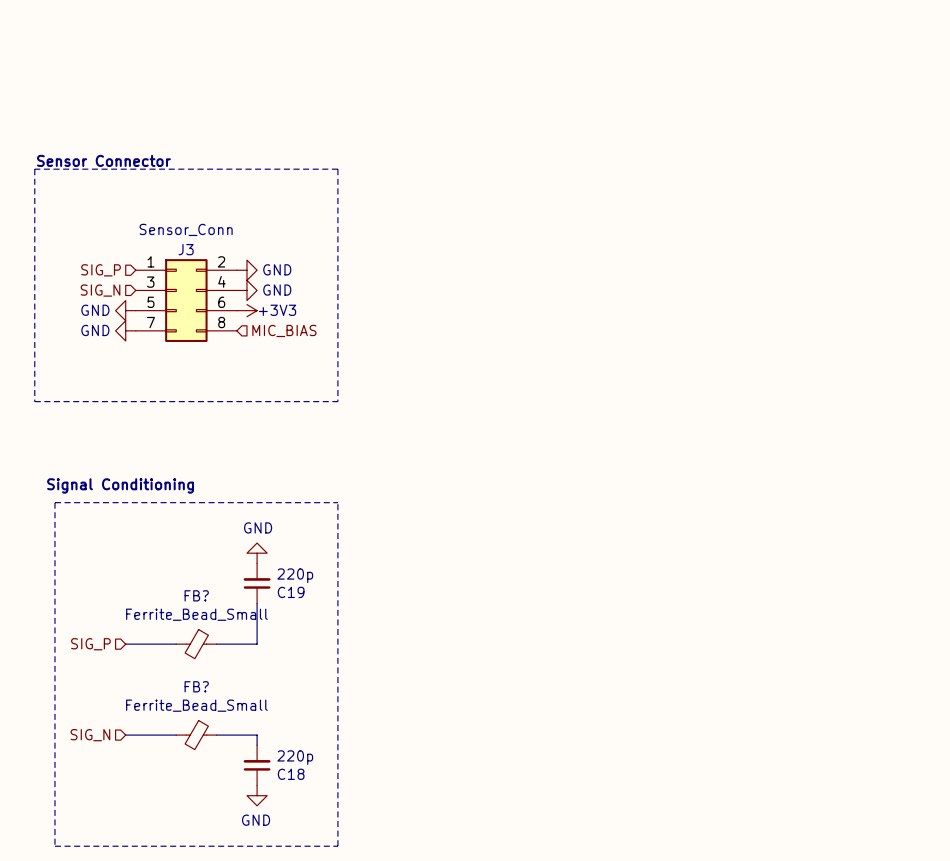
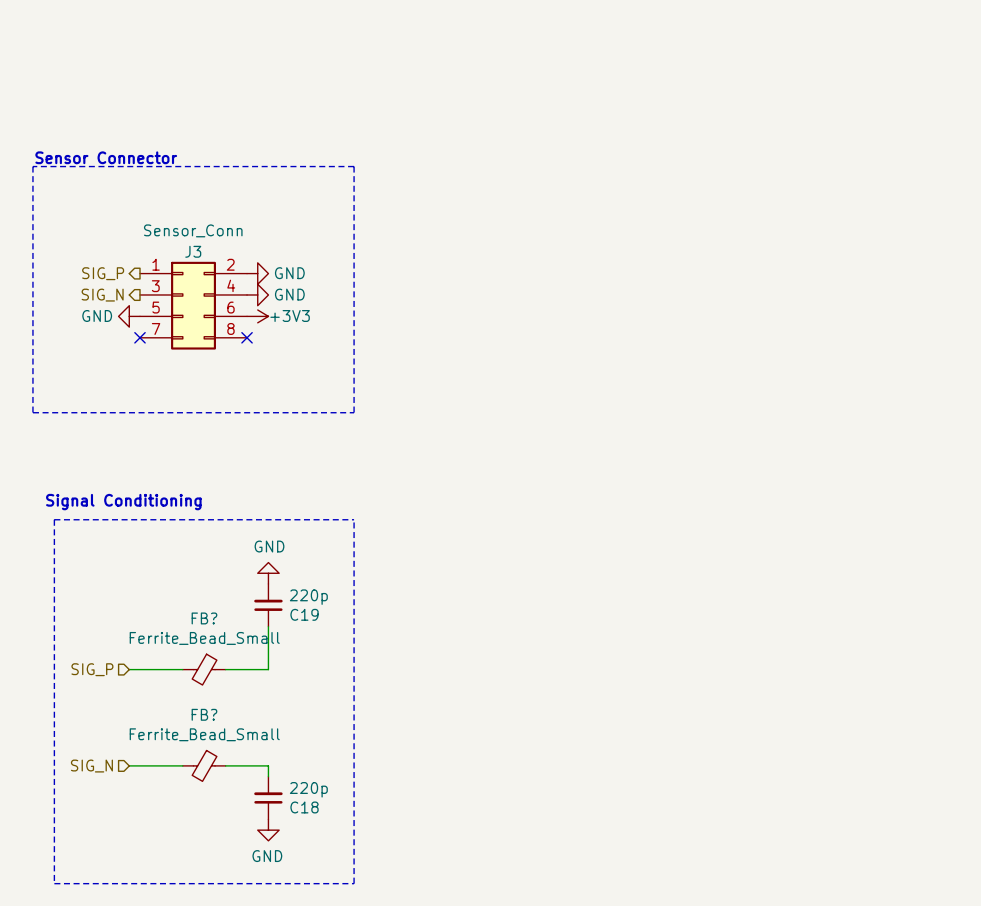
hierarchical label shape: input (101, 270) -> output (103, 273)
hierarchical label shape: input (100, 290) -> output (102, 295)
power symbol: GND (125, 330) -> none
no-connect mark: none -> (140, 337)
no-connect mark: none -> (247, 337)
hierarchical label: MIC_BIAS (284, 330) -> none

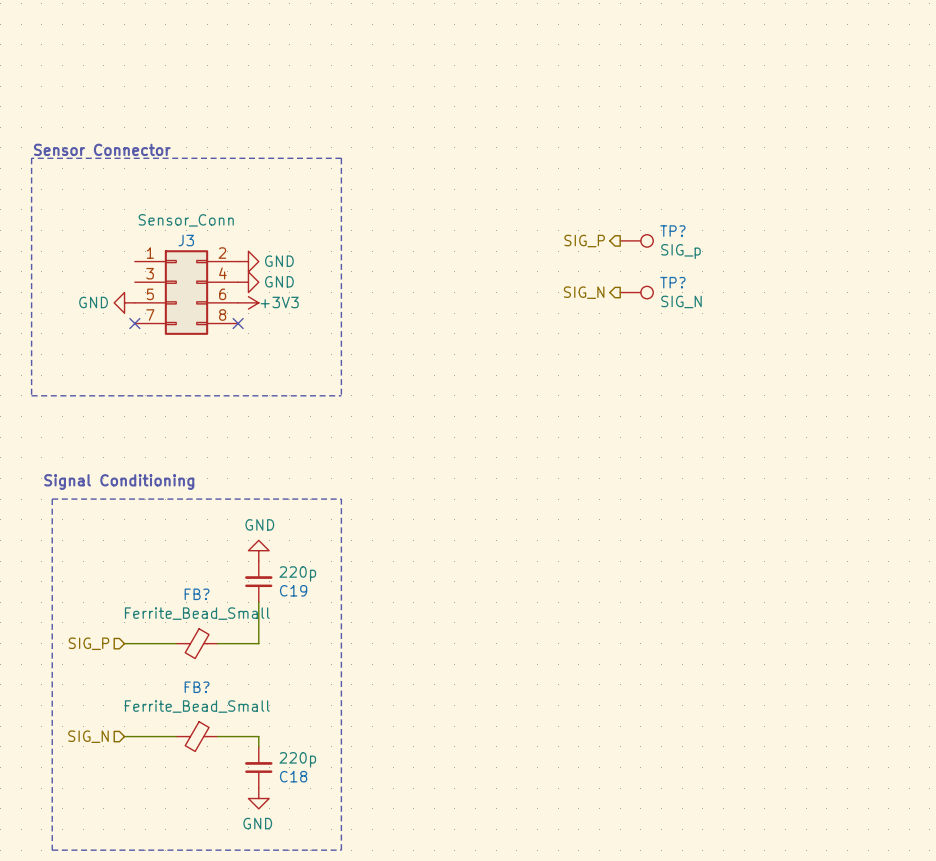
hierarchical label: none -> SIG_P (584, 241)
TP?: none -> SIG_p (636, 240)
hierarchical label: SIG_P (103, 273) -> none
hierarchical label: SIG_N (102, 295) -> none
hierarchical label: none -> SIG_N (584, 292)
TP?: none -> SIG_N (636, 292)

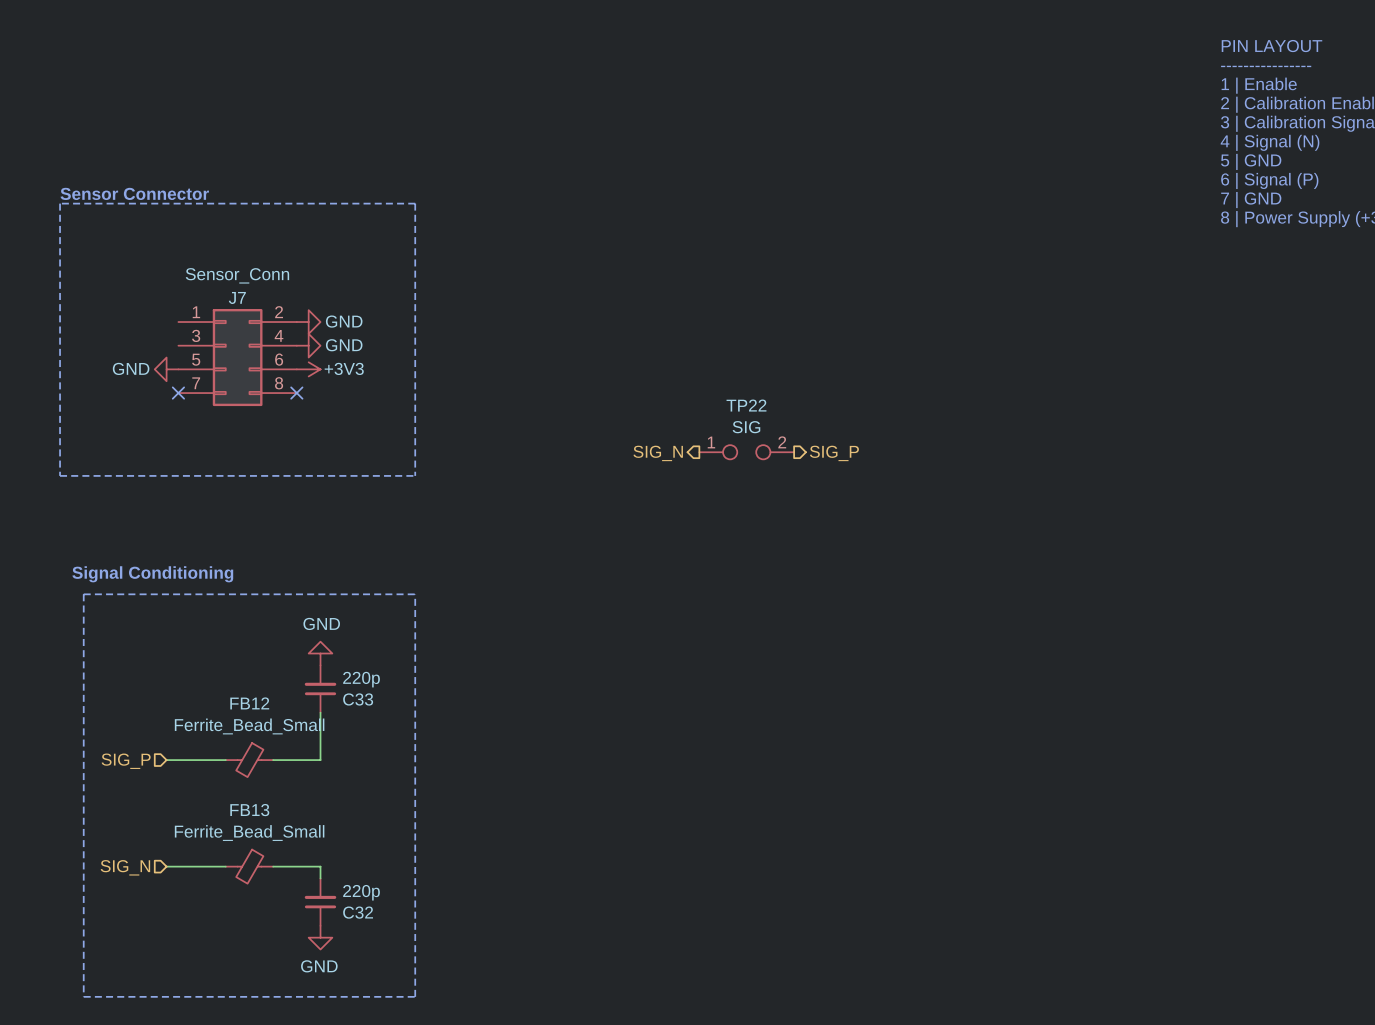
J3 name: J3 (186, 240) -> J7 (237, 297)
TP?: SIG_p (636, 240) -> none
hierarchical label rotation: 0° (584, 241) -> 180° (834, 453)
hierarchical label position: SIG_P (584, 241) -> SIG_P (834, 453)
hierarchical label position: SIG_N (584, 292) -> SIG_N (658, 453)
TP?: SIG_N (636, 292) -> none
TP22: none -> SIG (746, 452)
C19 name: C19 (293, 590) -> C33 (358, 699)
FB? name: FB? (197, 594) -> FB12 (249, 703)
FB? name: FB? (197, 687) -> FB13 (249, 810)
C18 name: C18 (293, 776) -> C32 (358, 912)

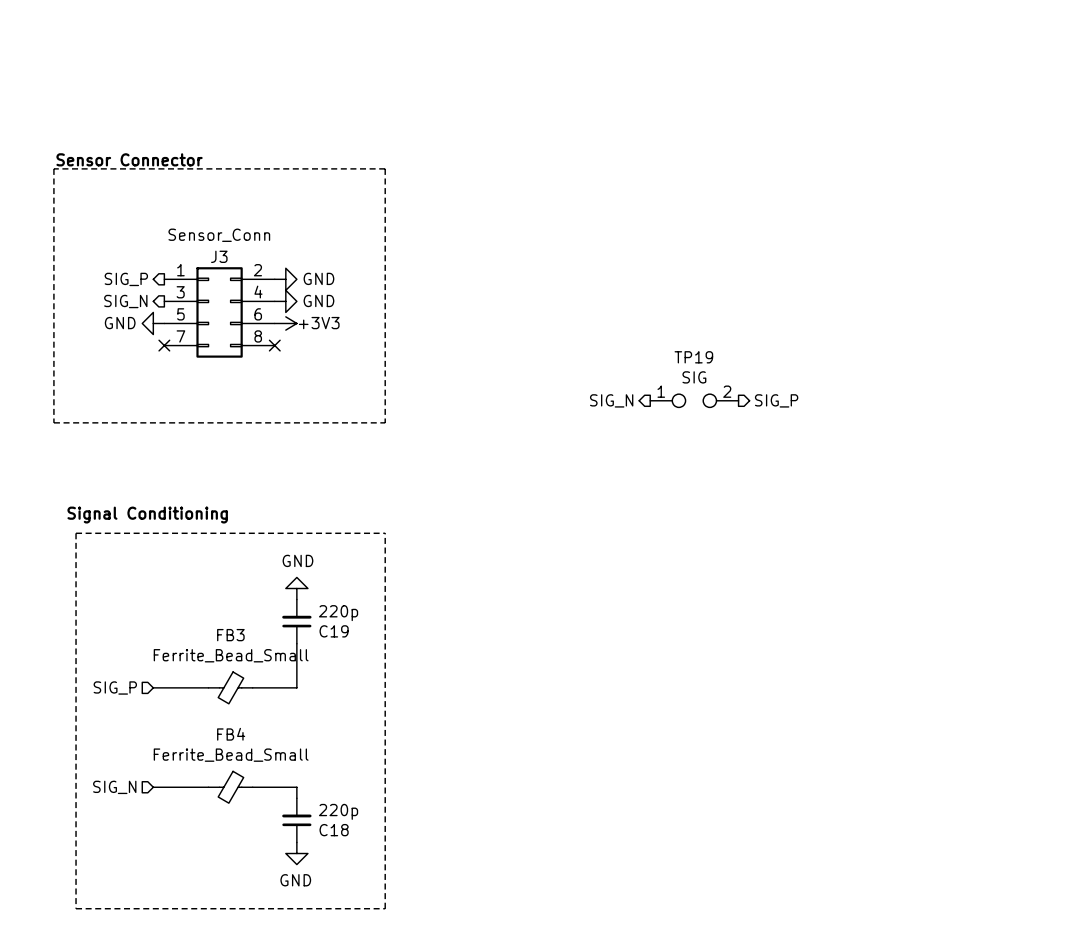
J7 name: J7 (237, 297) -> J3 (219, 256)
hierarchical label: none -> SIG_P (126, 279)
hierarchical label: none -> SIG_N (125, 301)
TP22 name: TP22 (746, 405) -> TP19 (693, 357)
C33 name: C33 (358, 699) -> C19 (334, 631)
FB12 name: FB12 (249, 703) -> FB3 (230, 635)
FB13 name: FB13 (249, 810) -> FB4 (231, 734)
C32 name: C32 (358, 912) -> C18 (334, 830)

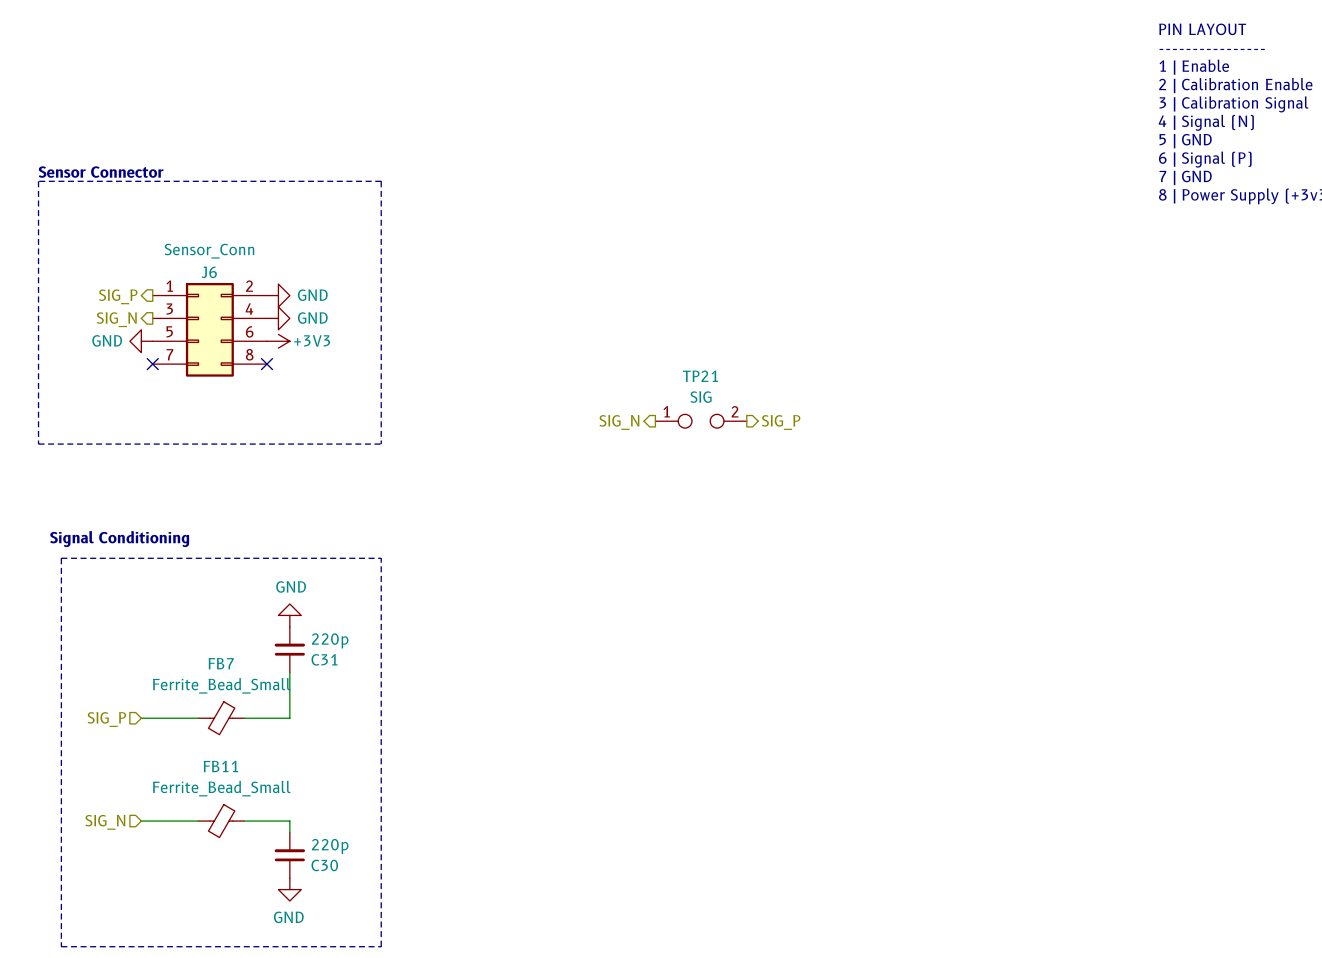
J3 name: J3 (219, 256) -> J6 (209, 272)
TP19 name: TP19 (693, 357) -> TP21 (700, 376)
C19 name: C19 (334, 631) -> C31 (324, 659)
FB3 name: FB3 (230, 635) -> FB7 (221, 663)
FB4 name: FB4 (231, 734) -> FB11 (220, 766)
C18 name: C18 (334, 830) -> C30 (324, 865)

